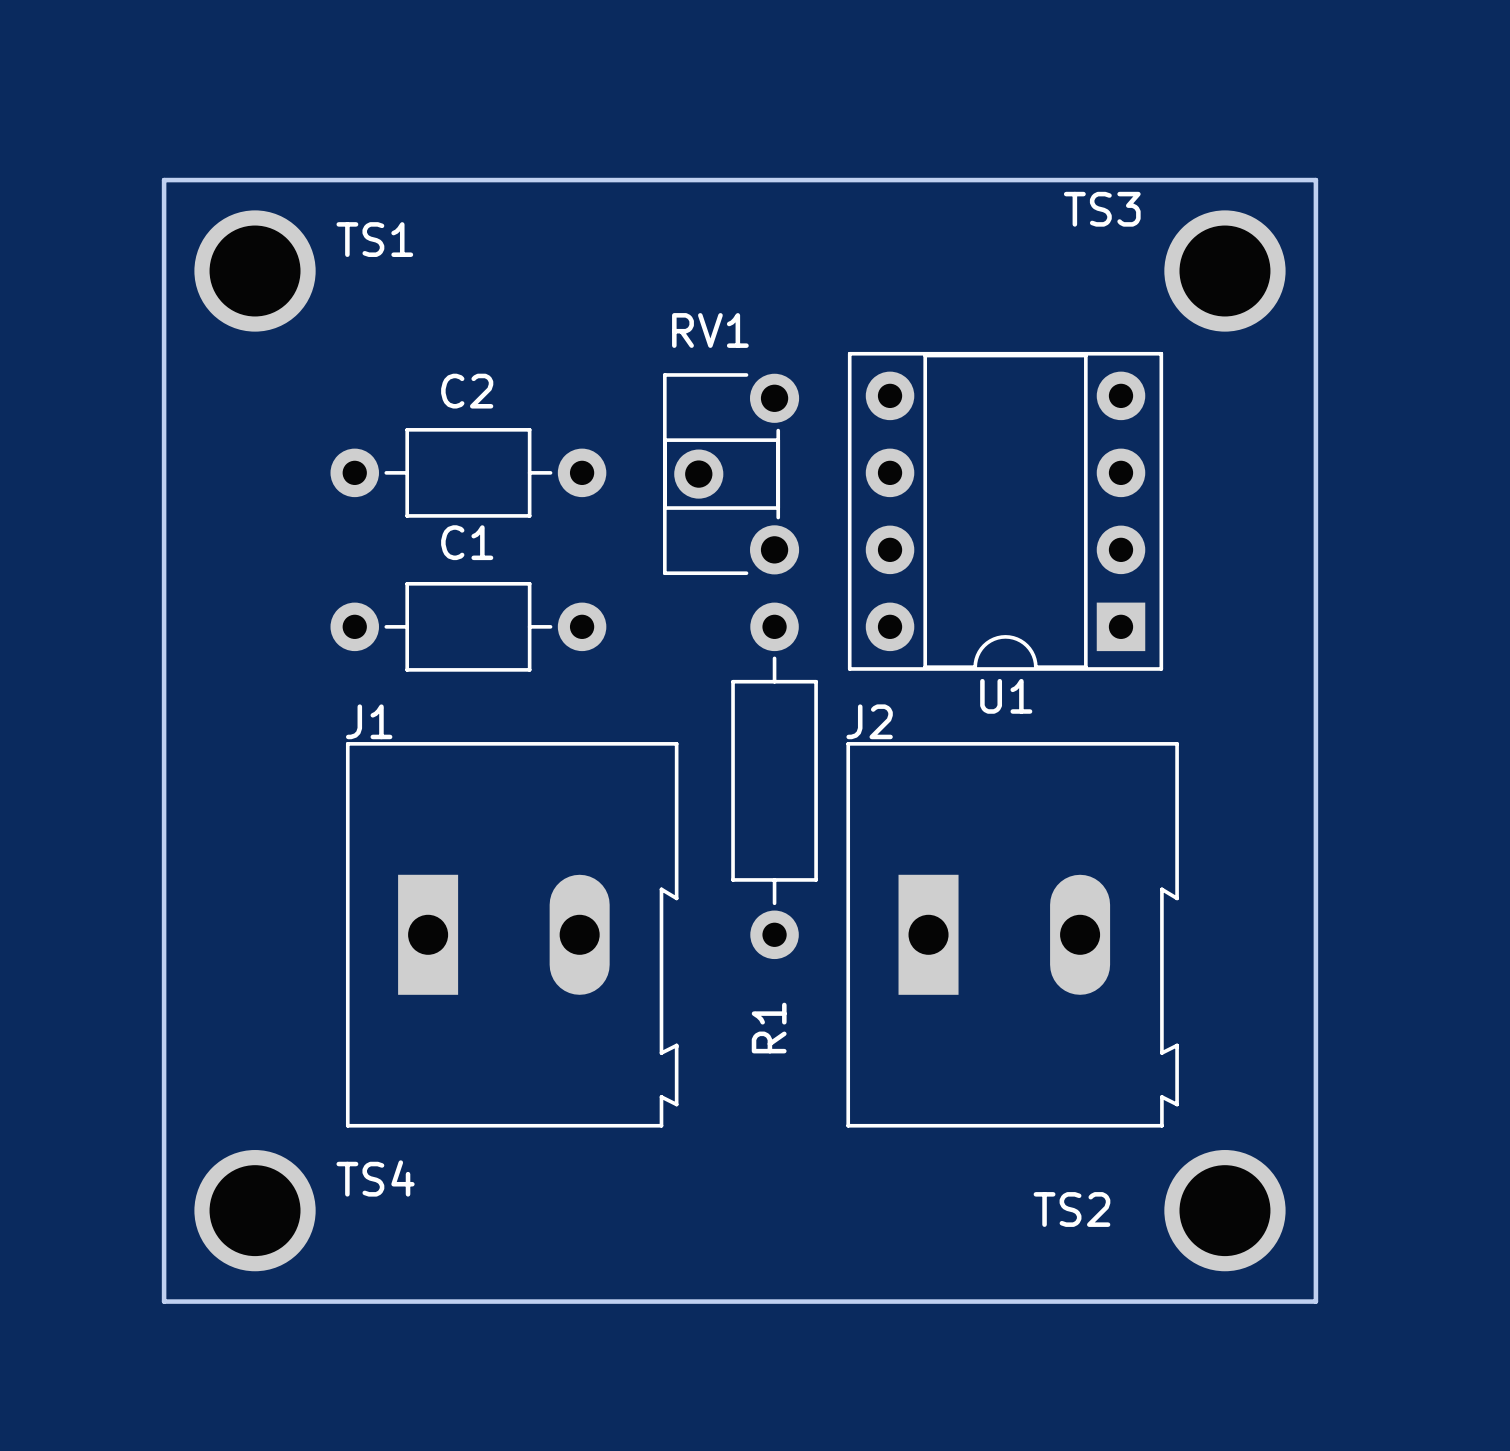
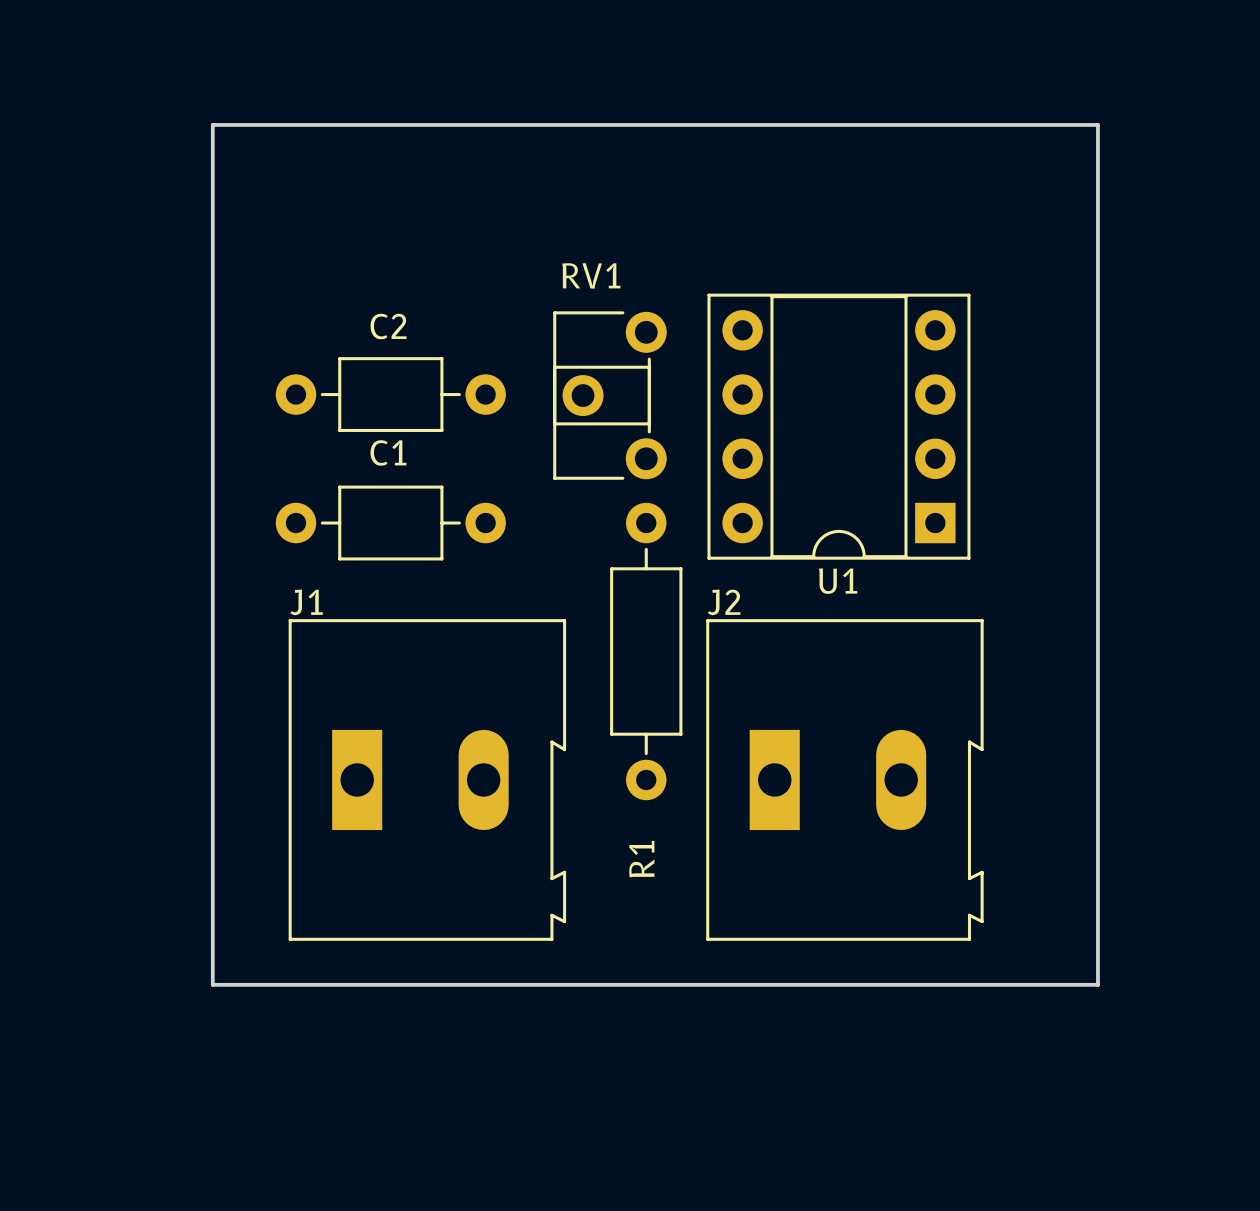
board edge: (1315, 180) (164, 180) (164, 1301) (1315, 1301) (1315, 1180) -> (1097, 150) (1097, 124) (212, 124) (212, 984) (1097, 984)
TS1: (255, 271) -> none
TS3: (1224, 271) -> none
TS4: (255, 1210) -> none
TS2: (1224, 1210) -> none

